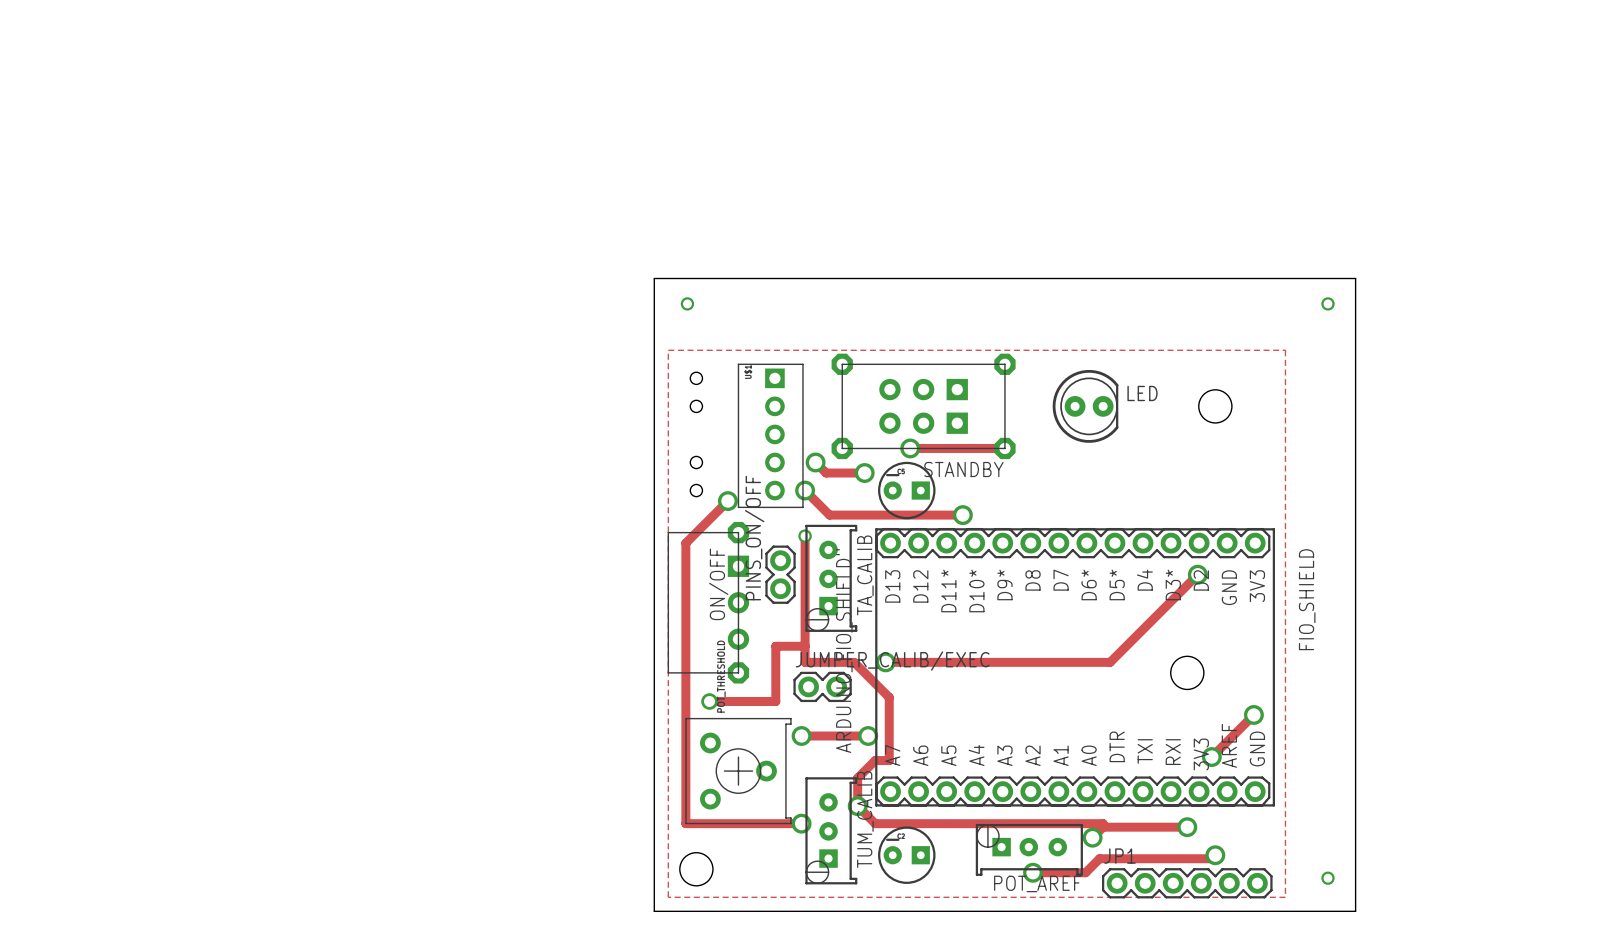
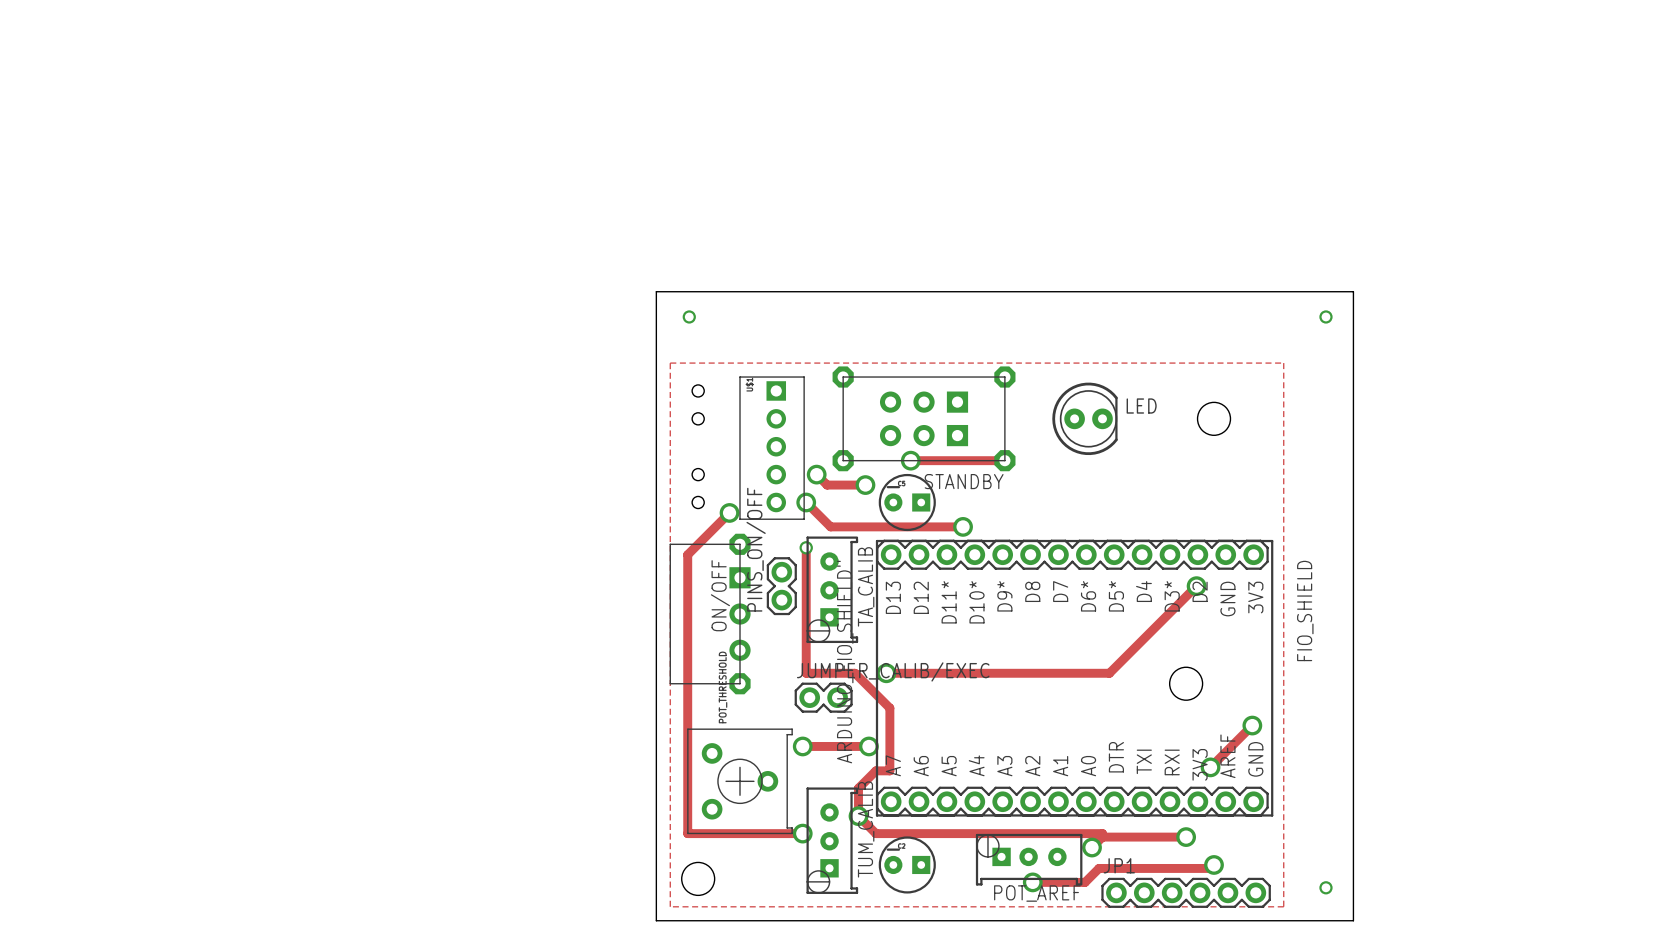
track: (805, 646) (775, 646) (775, 701) (709, 701) -> none
via: (709, 701) -> none

